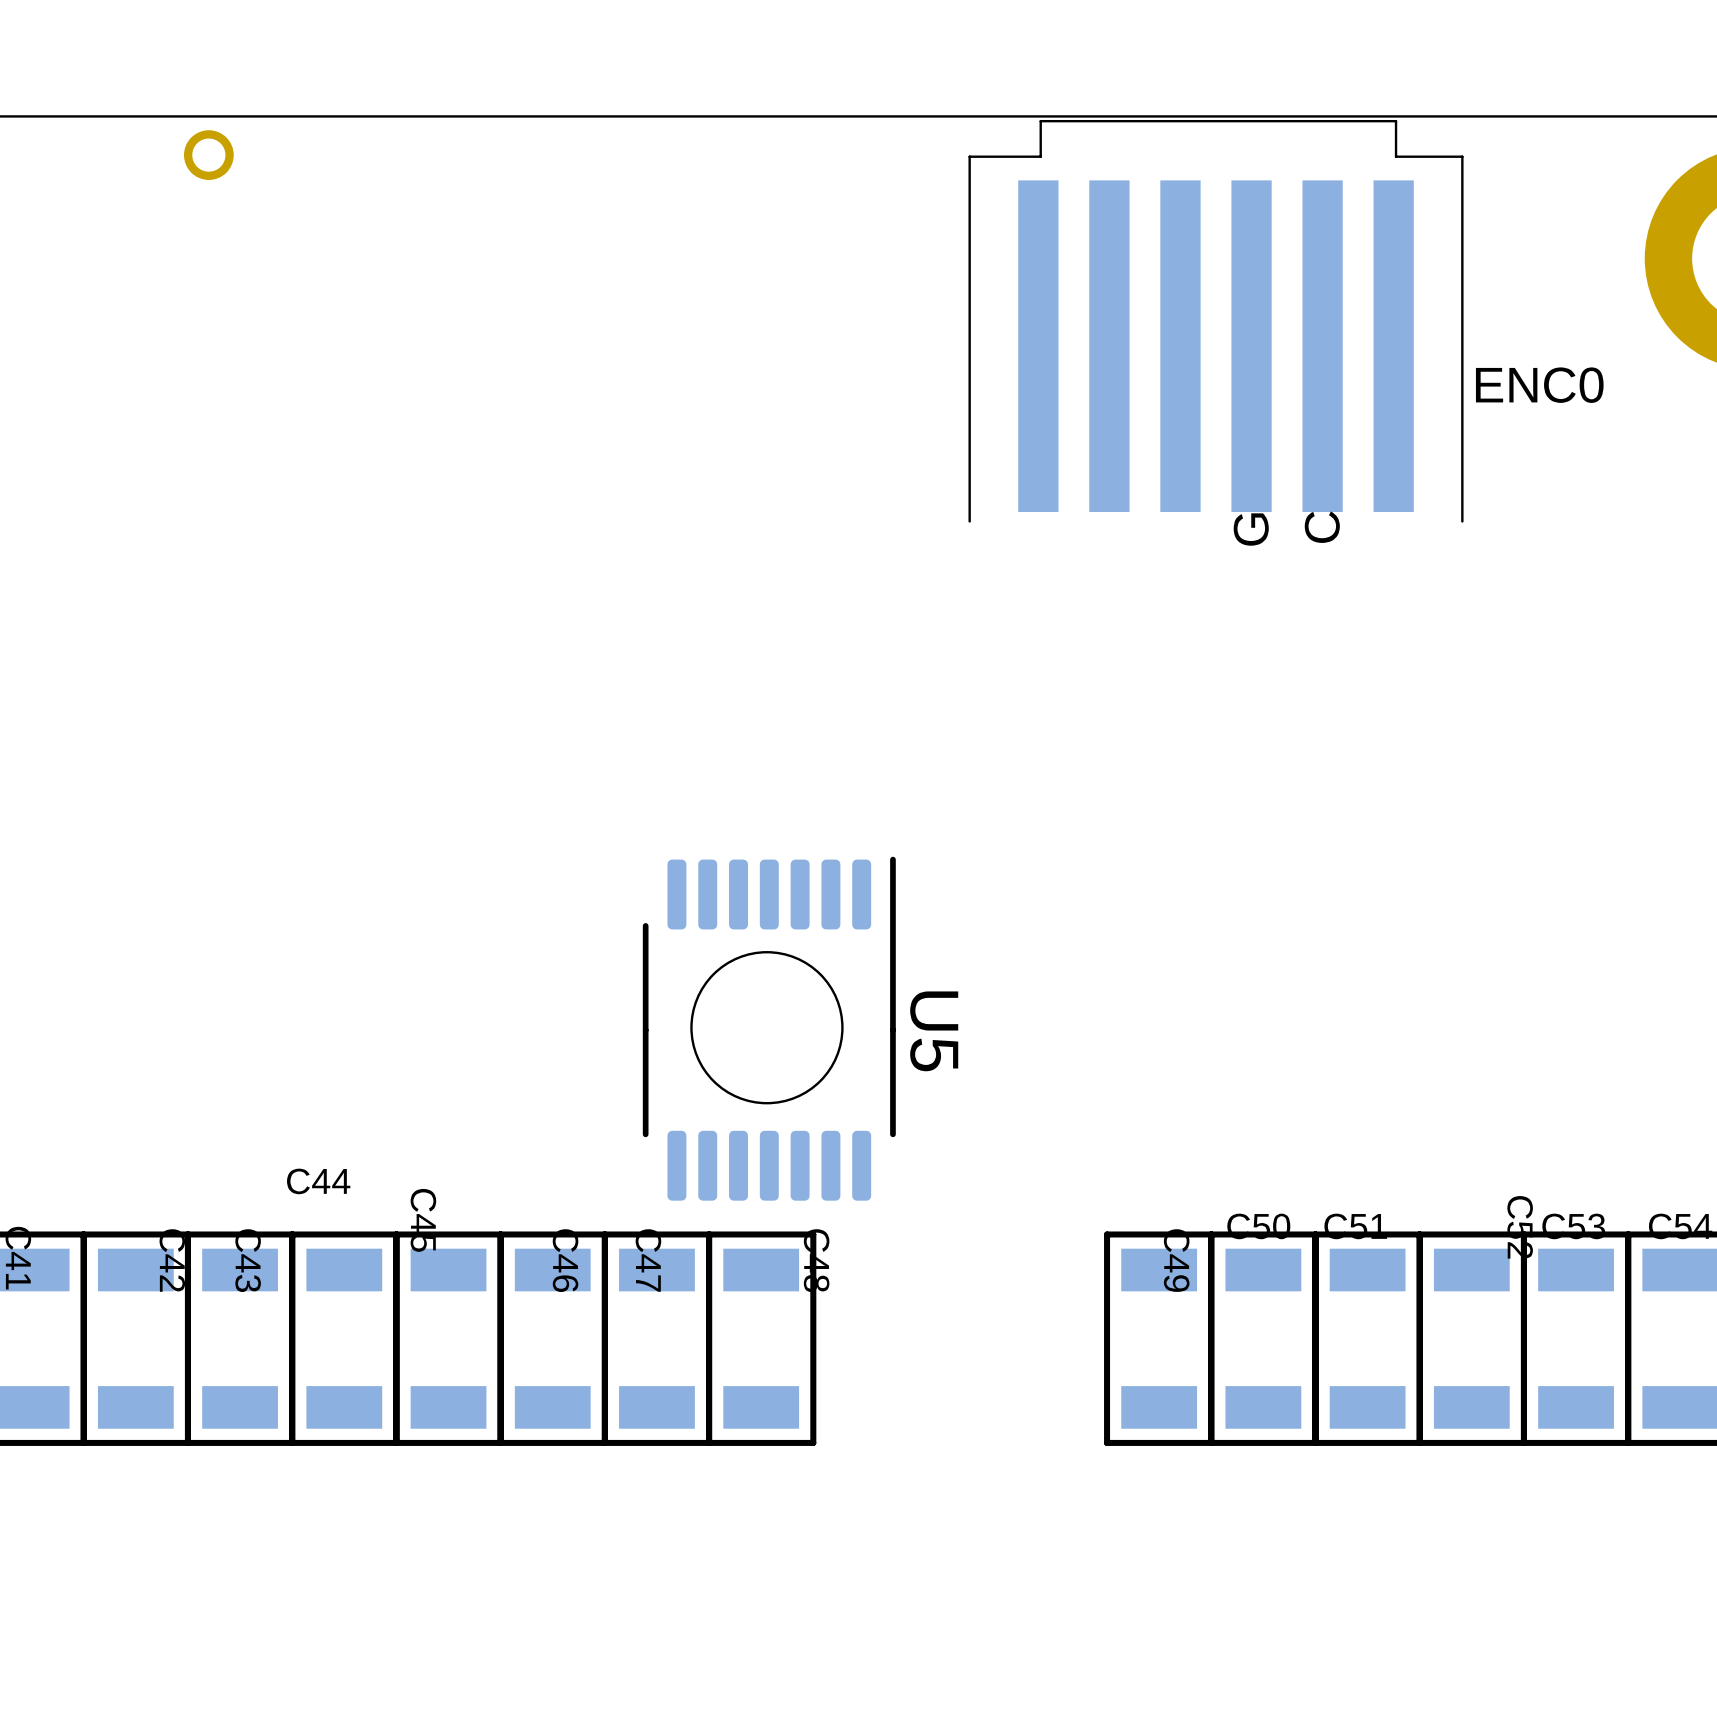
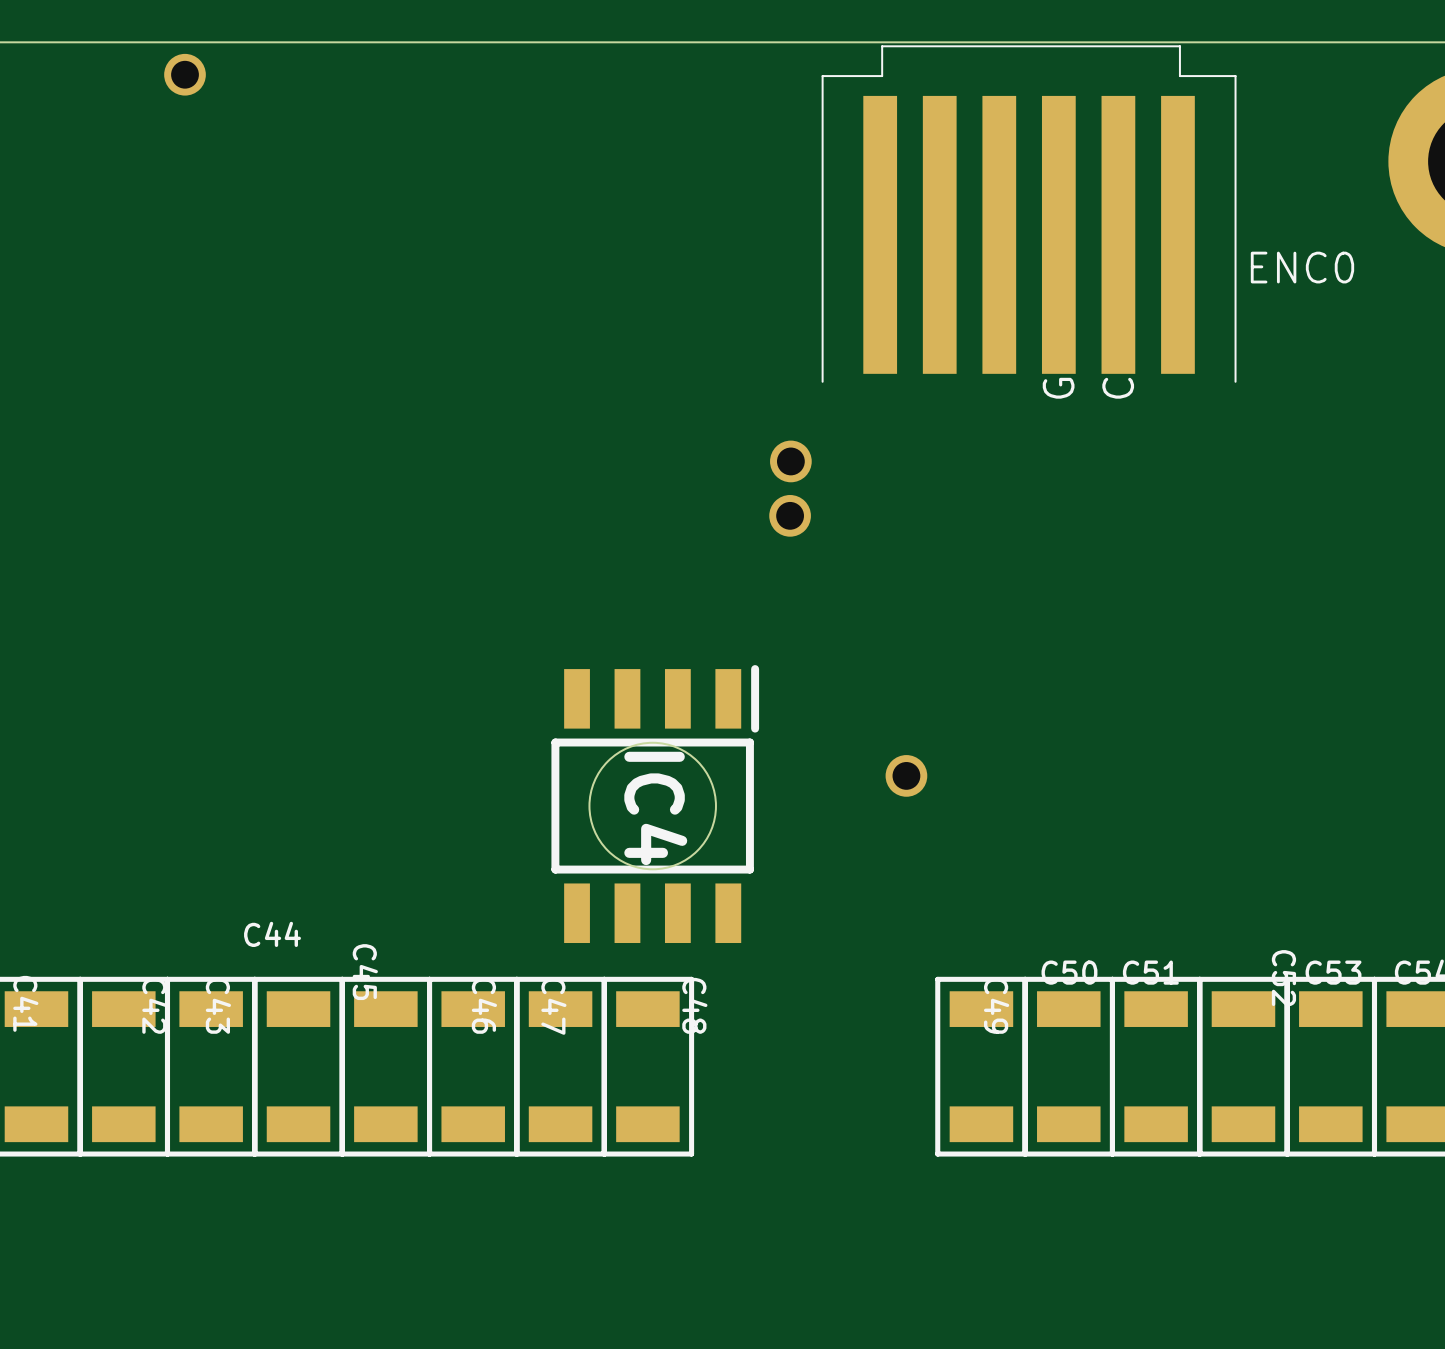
part: none -> (790, 461)
part: none -> (790, 515)
part: none -> (906, 775)
IC4: none -> (655, 804)
U5: (769, 1028) -> none

